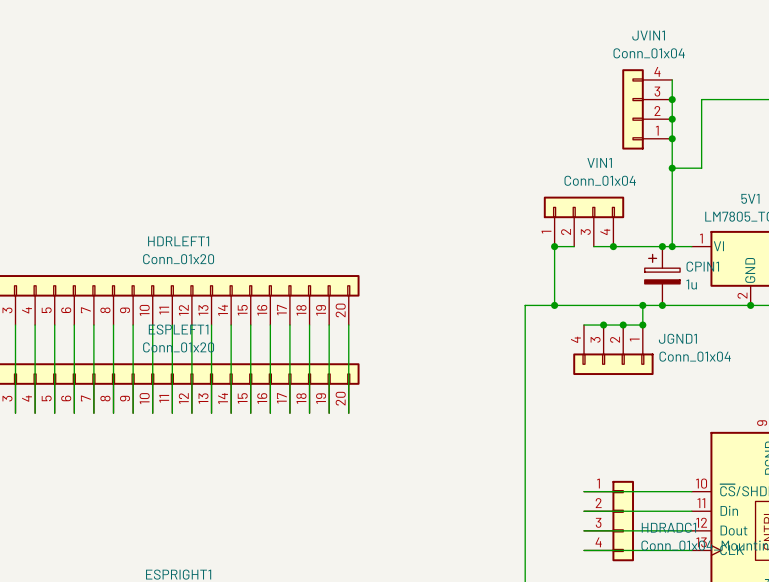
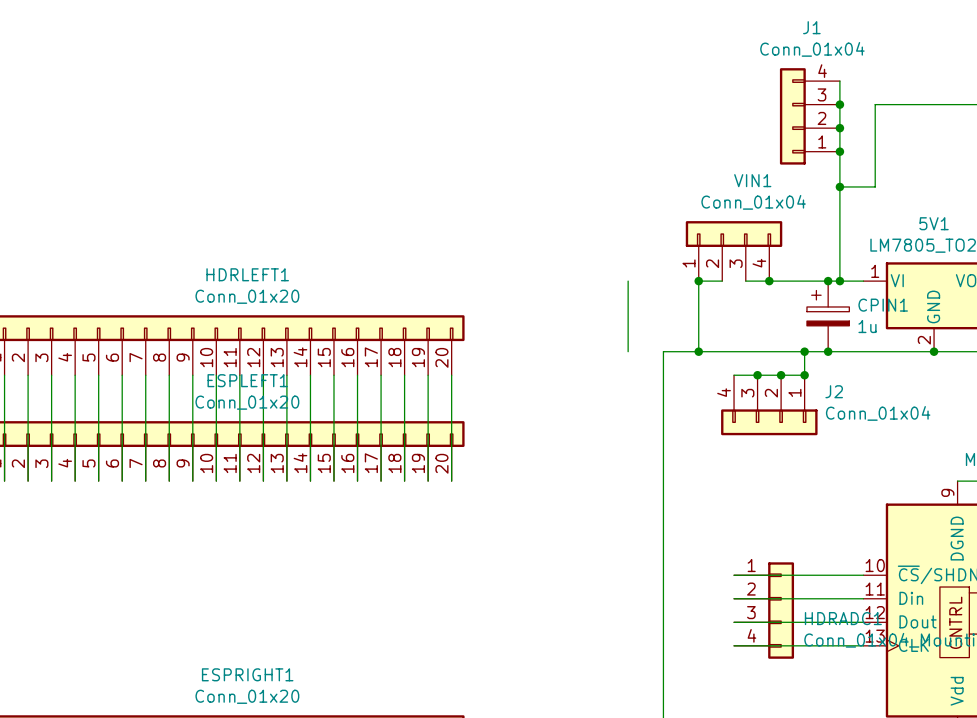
JVIN1 name: JVIN1 (648, 35) -> J1 (811, 27)
wire: none -> (628, 281) (628, 351)
JGND1 name: JGND1 (677, 338) -> J2 (834, 391)

